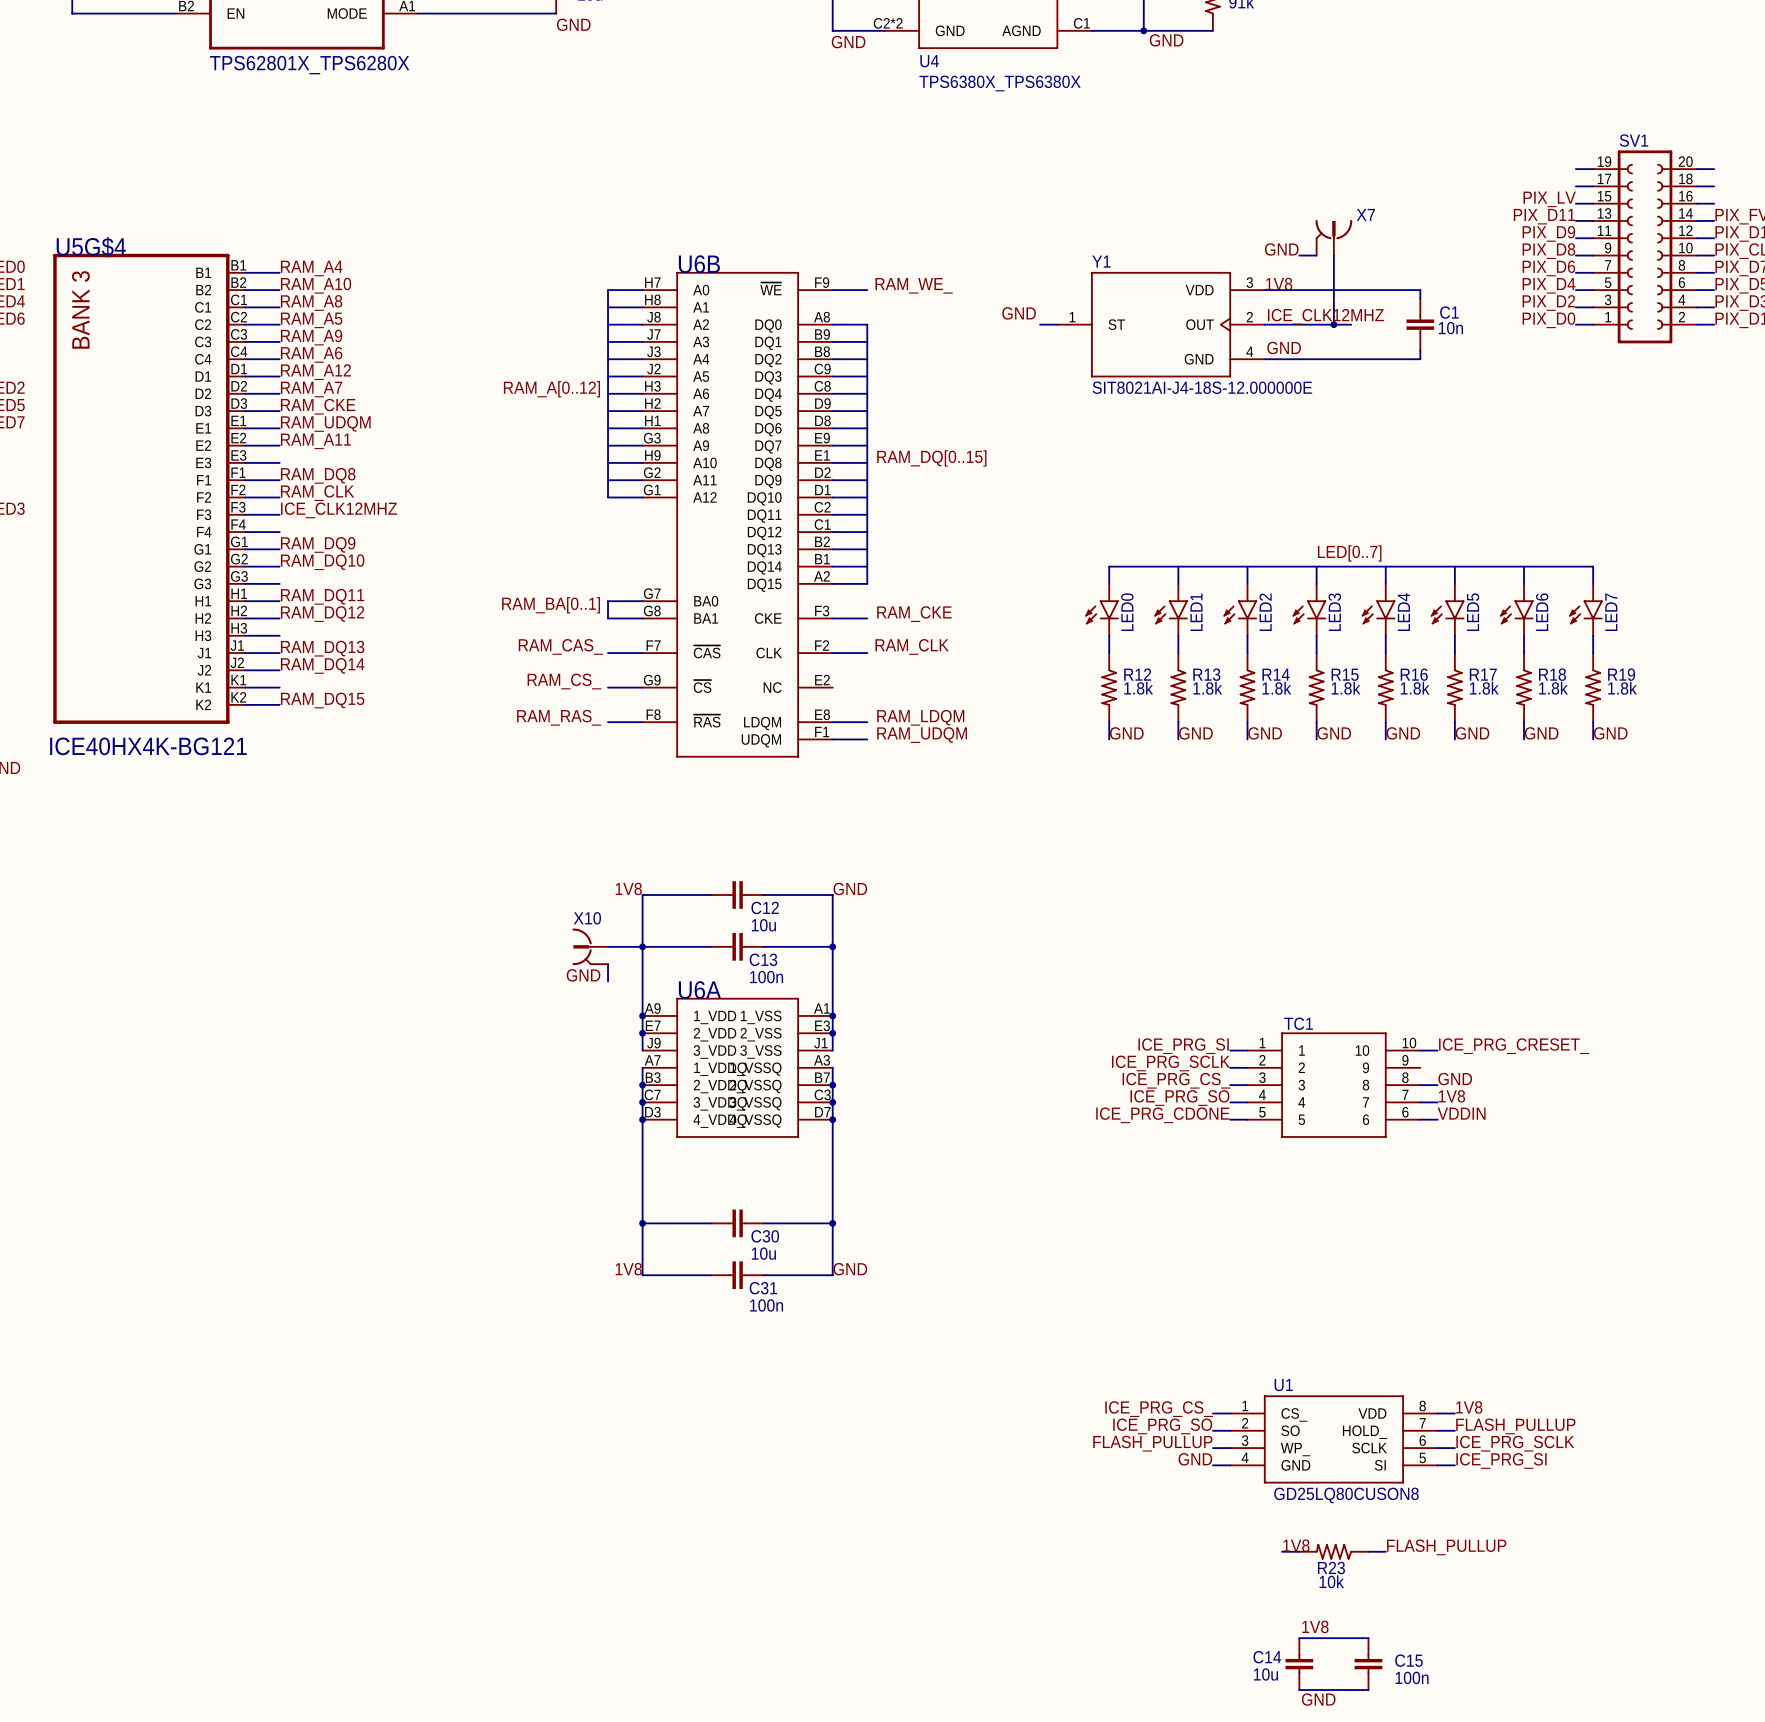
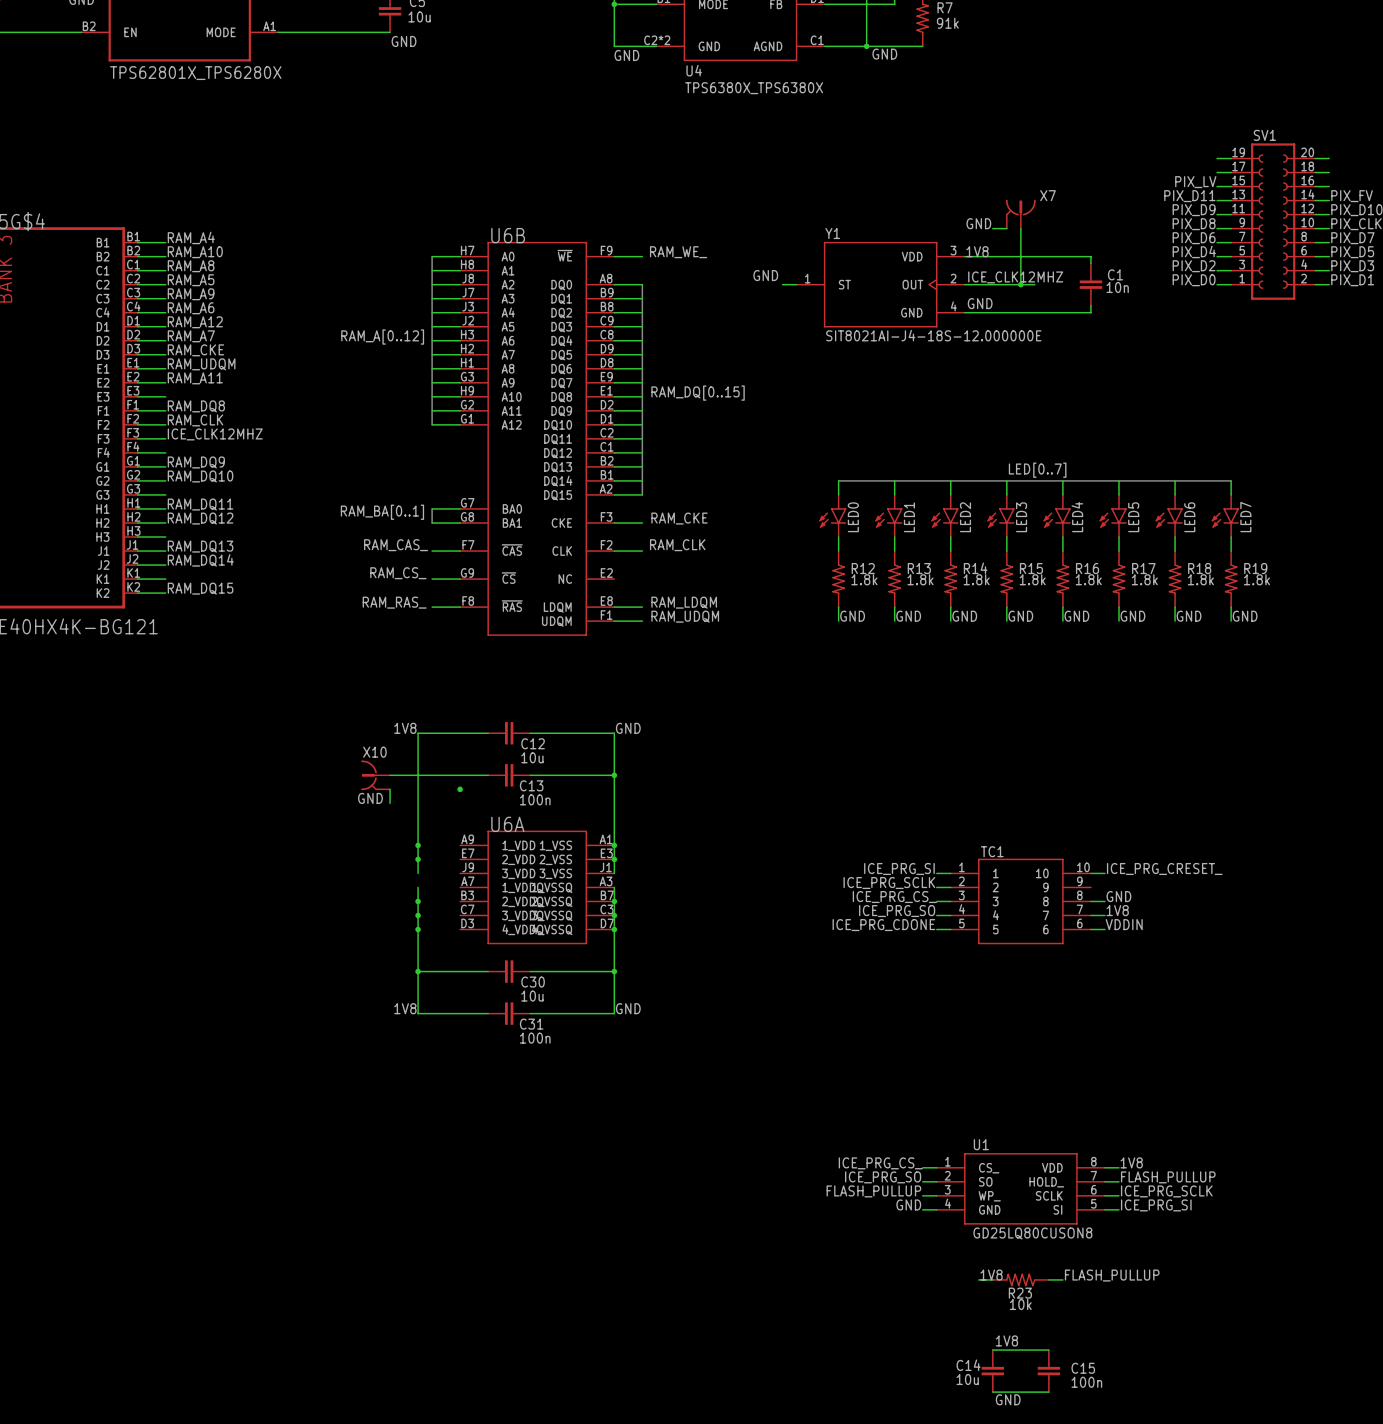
wire: none -> (488, 733) (418, 733) (418, 873)
label position: 1V8 (628, 888) -> 1V8 (405, 728)
label position: GND (850, 888) -> GND (628, 728)
wire: (711, 895) (642, 895) (642, 1050) -> none
C12 position: (737, 895) -> (509, 733)
wire: (763, 895) (832, 895) -> (530, 733) (614, 733) (614, 747)
wire: none -> (390, 775) (488, 775)
X10 position: (590, 946) -> (375, 775)
wire: (608, 946) (711, 946) -> (530, 775) (614, 775)
C13 position: (737, 946) -> (509, 775)
wire: (763, 946) (832, 946) -> none
junction position: (832, 946) -> (614, 775)
wire: (608, 964) (608, 981) -> (390, 789) (390, 803)
label position: GND (583, 975) -> GND (370, 798)
junction: none -> (418, 845)
junction: (642, 1015) -> none
junction: none -> (418, 859)
junction: (642, 1033) -> none
wire: none -> (418, 887) (418, 1013) (460, 1013)
wire: (642, 1067) (642, 1275) (711, 1275) -> none
junction: none -> (418, 901)
junction: (642, 1085) -> none
junction: none -> (418, 915)
junction: (642, 1102) -> none
junction: none -> (418, 929)
junction: (642, 1119) -> none
wire: none -> (418, 971) (488, 971)
junction: none -> (418, 971)
wire: none -> (530, 971) (614, 971)
junction: none -> (614, 971)
junction: (642, 1223) -> none
C30 position: (737, 1223) -> (509, 971)
wire: (832, 1223) (832, 1275) (763, 1275) -> none
junction: (832, 1223) -> none
label position: 1V8 (628, 1269) -> 1V8 (405, 1008)
label position: GND (850, 1269) -> GND (628, 1008)
C31 position: (737, 1275) -> (509, 1013)

